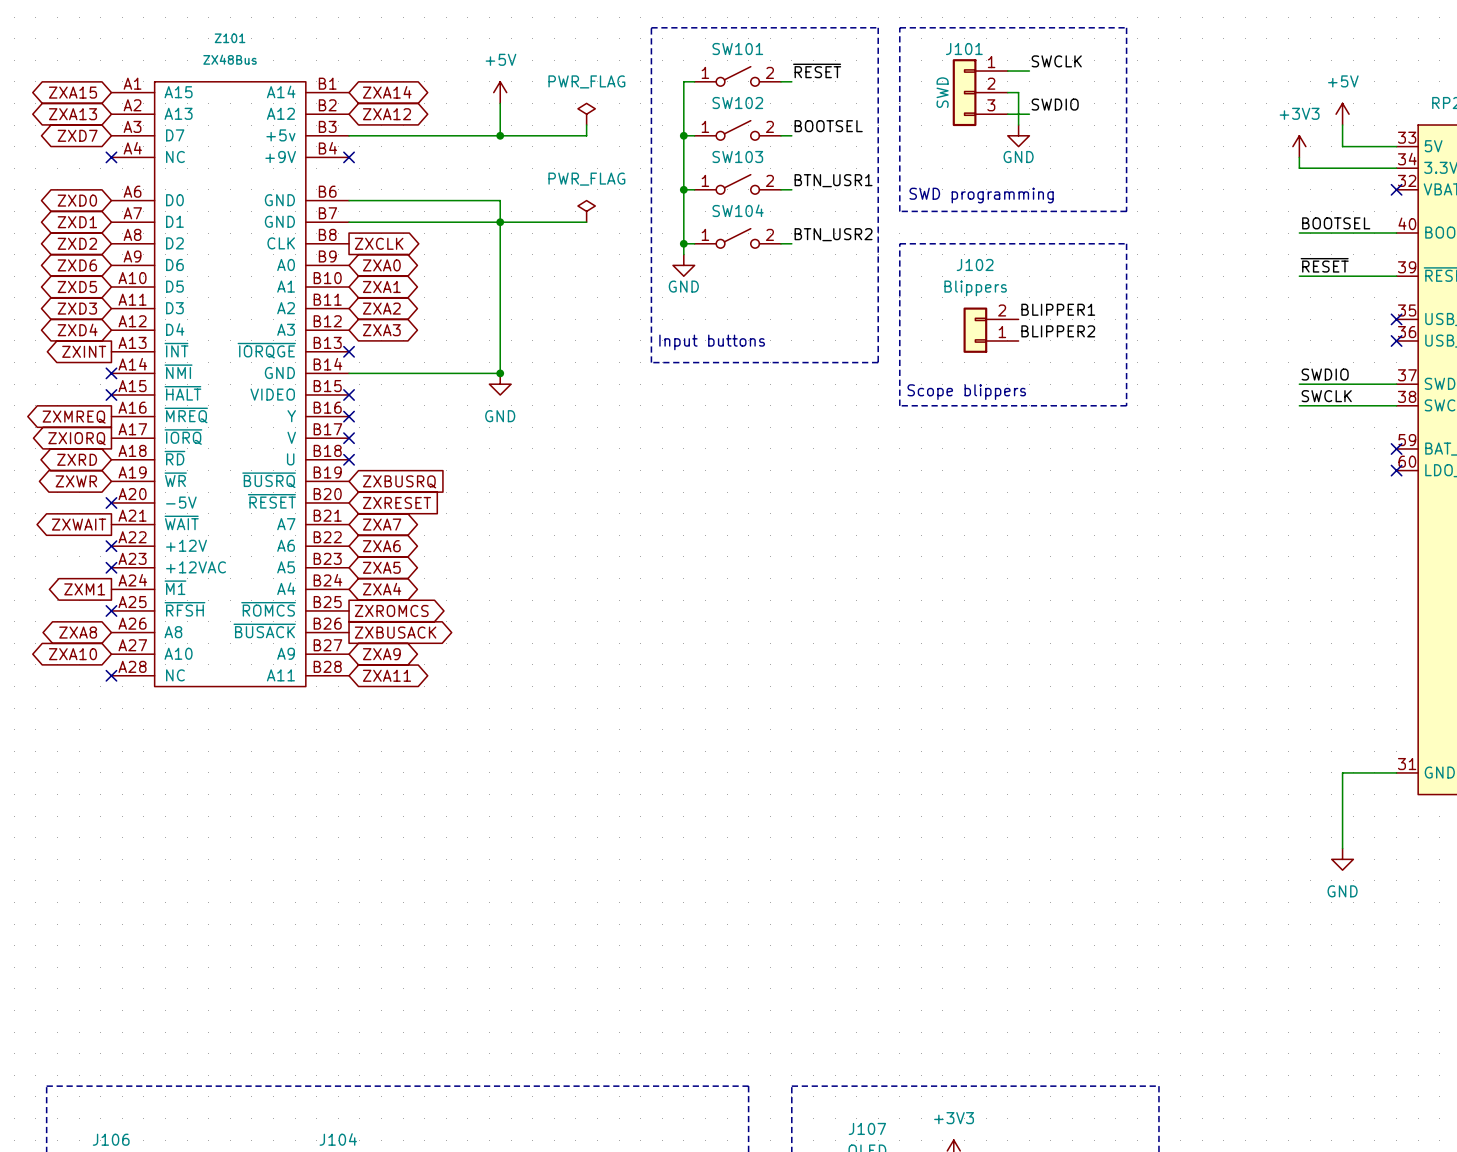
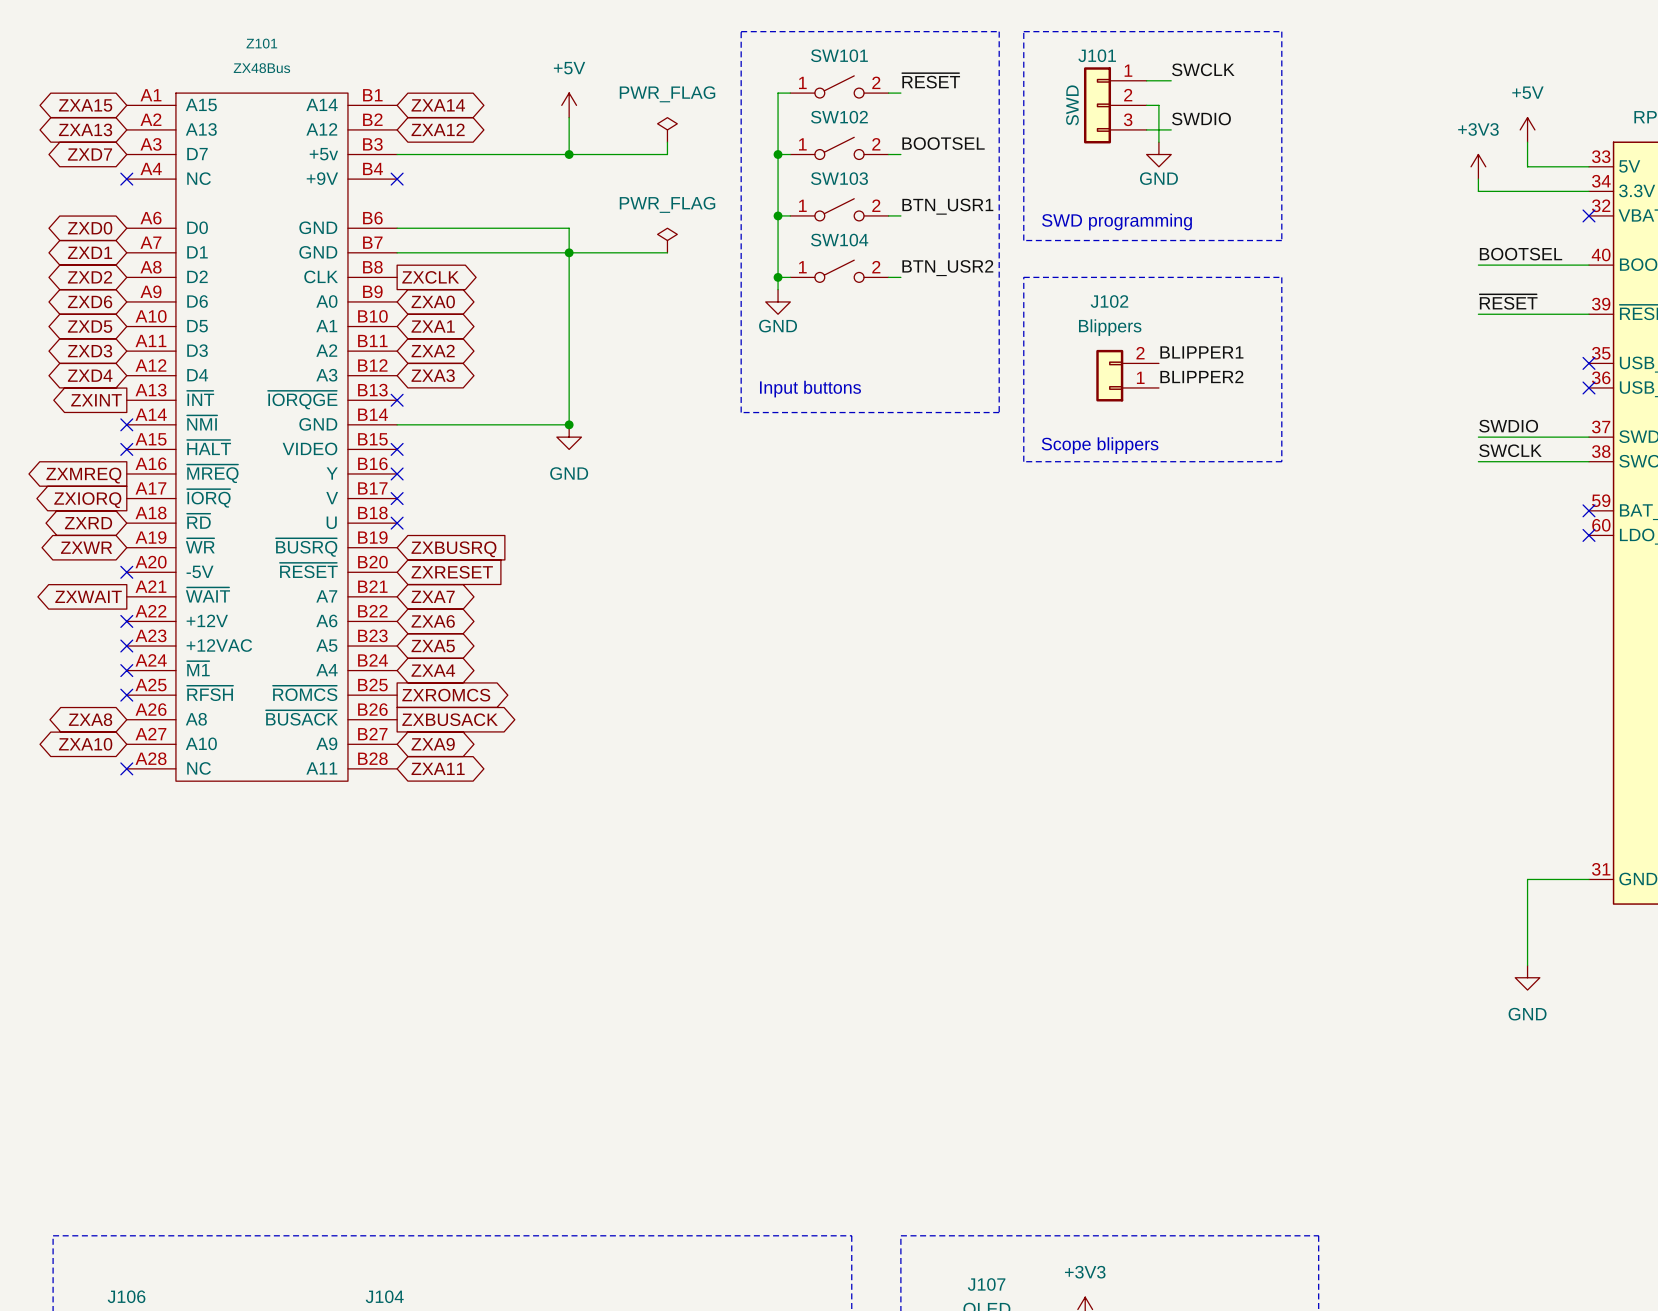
global label: ZXM1 (84, 589) -> none
no-connect mark: none -> (126, 670)

